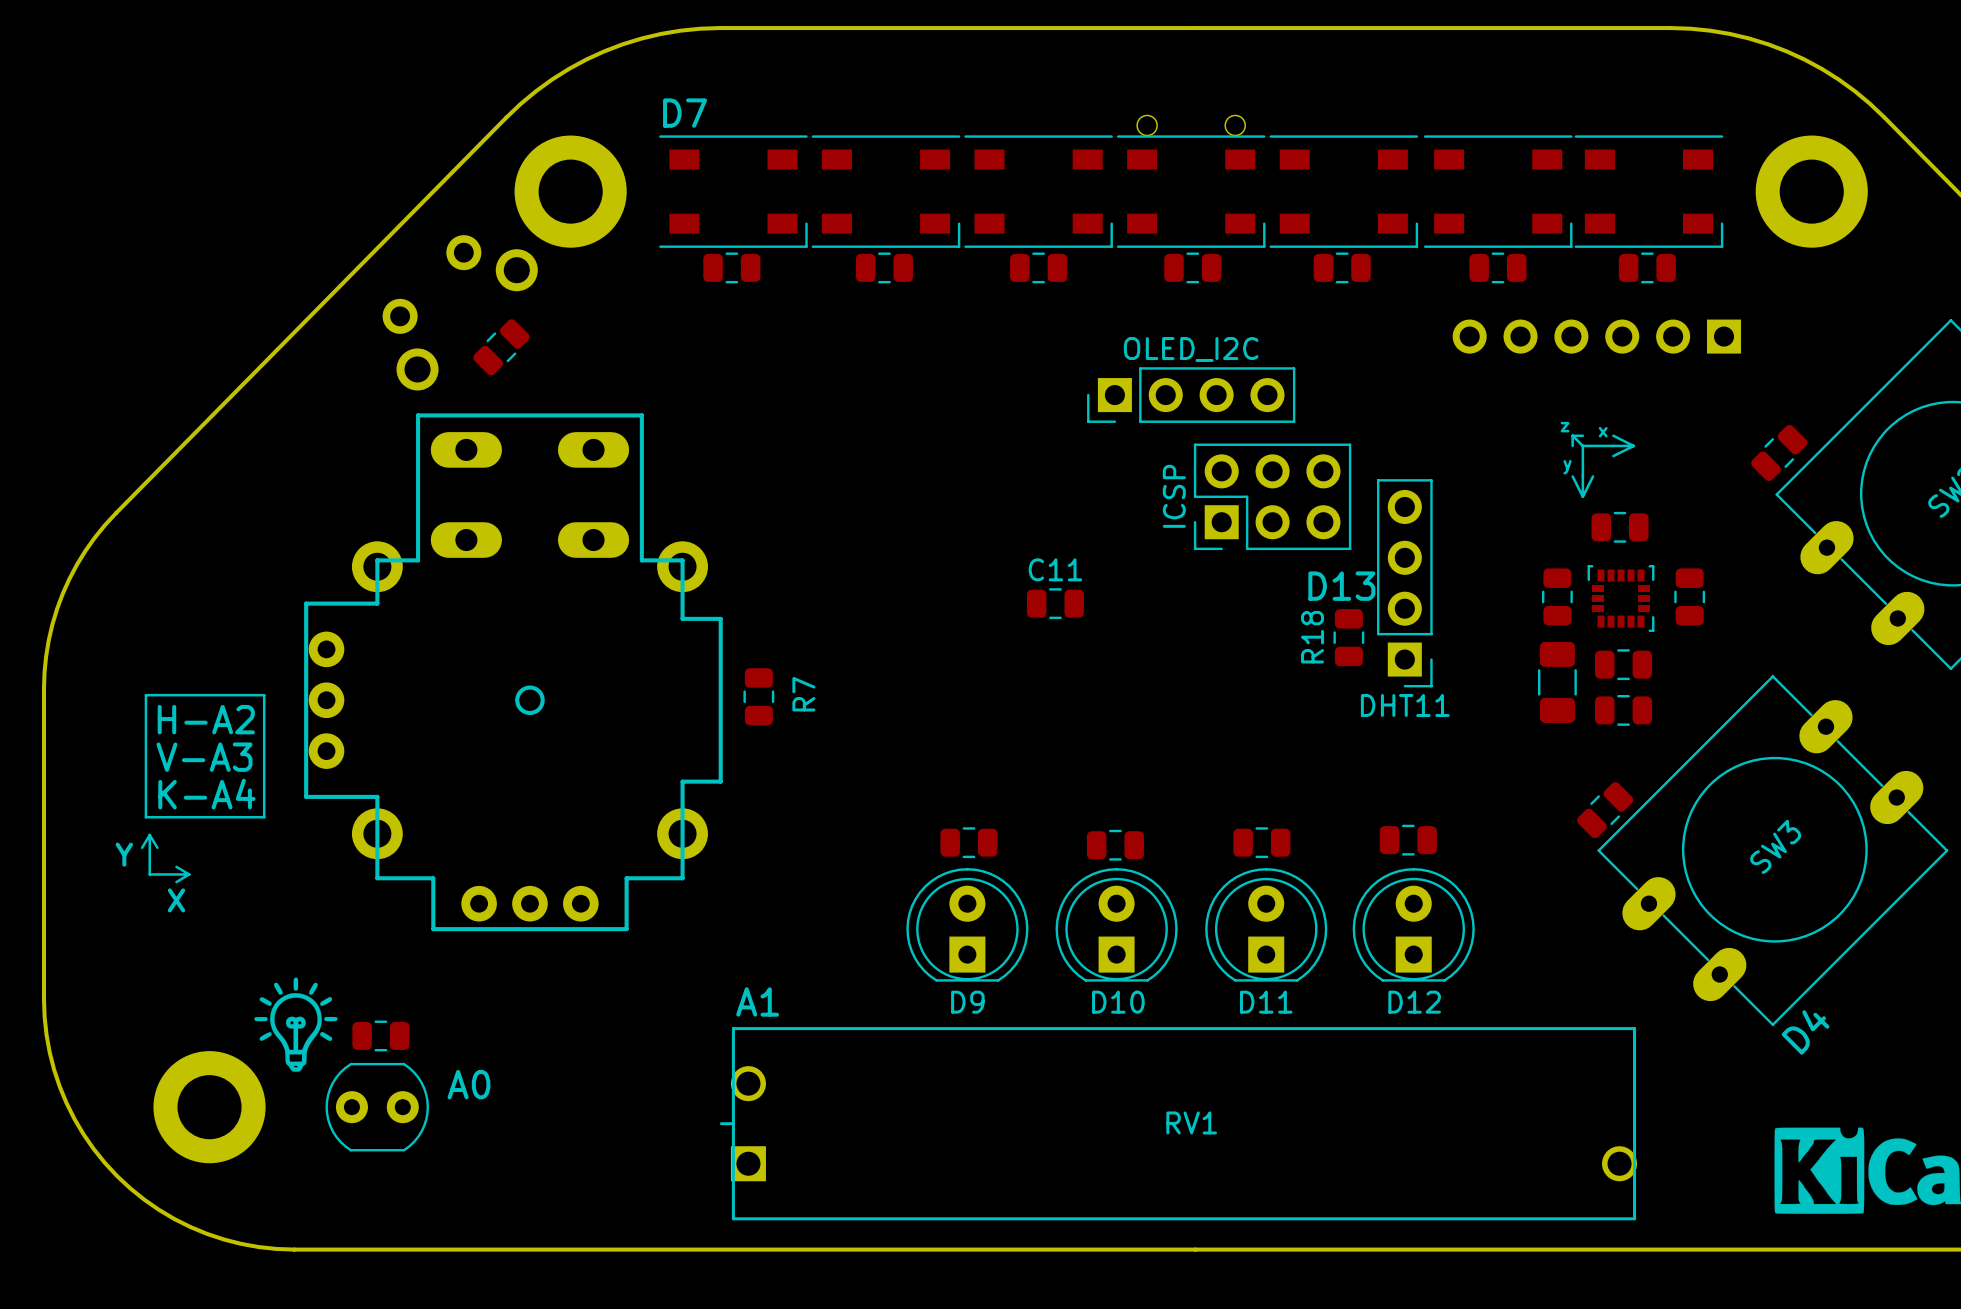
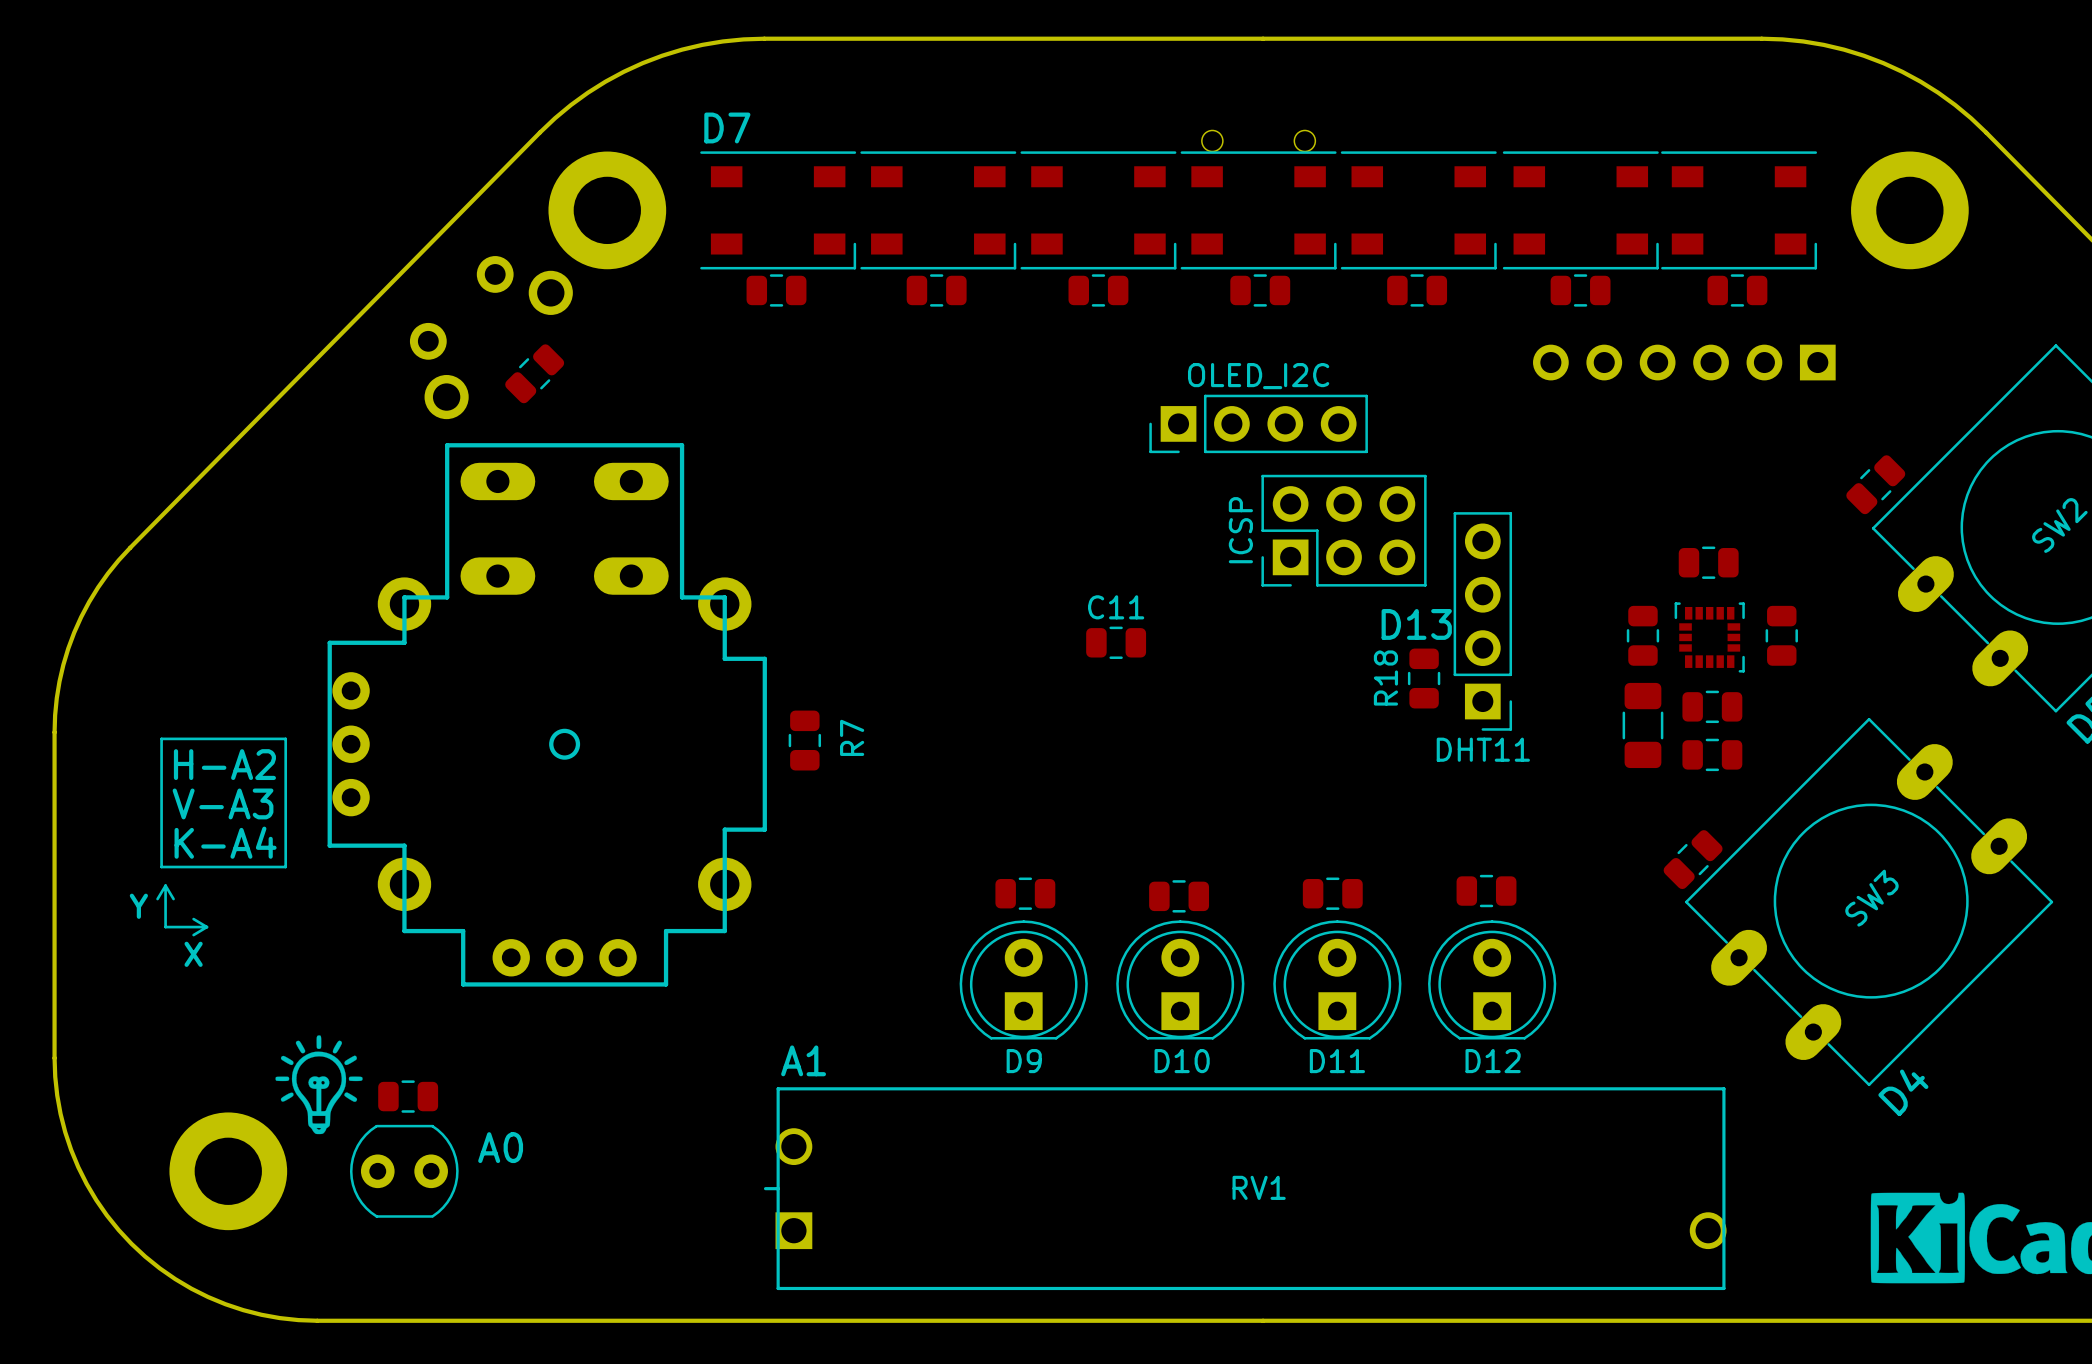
text: z (1565, 427) -> none
text: x (1603, 432) -> none
line: (1572, 435) (1582, 435) -> none
line: (1572, 435) (1582, 445) -> none
line: (1572, 435) (1572, 445) -> none
line: (1613, 435) (1633, 445) -> none
line: (1582, 445) (1633, 445) -> none
line: (1582, 445) (1582, 496) -> none
line: (1633, 445) (1613, 456) -> none
text: y (1567, 467) -> none
line: (1572, 476) (1582, 496) -> none
line: (1593, 476) (1582, 496) -> none

